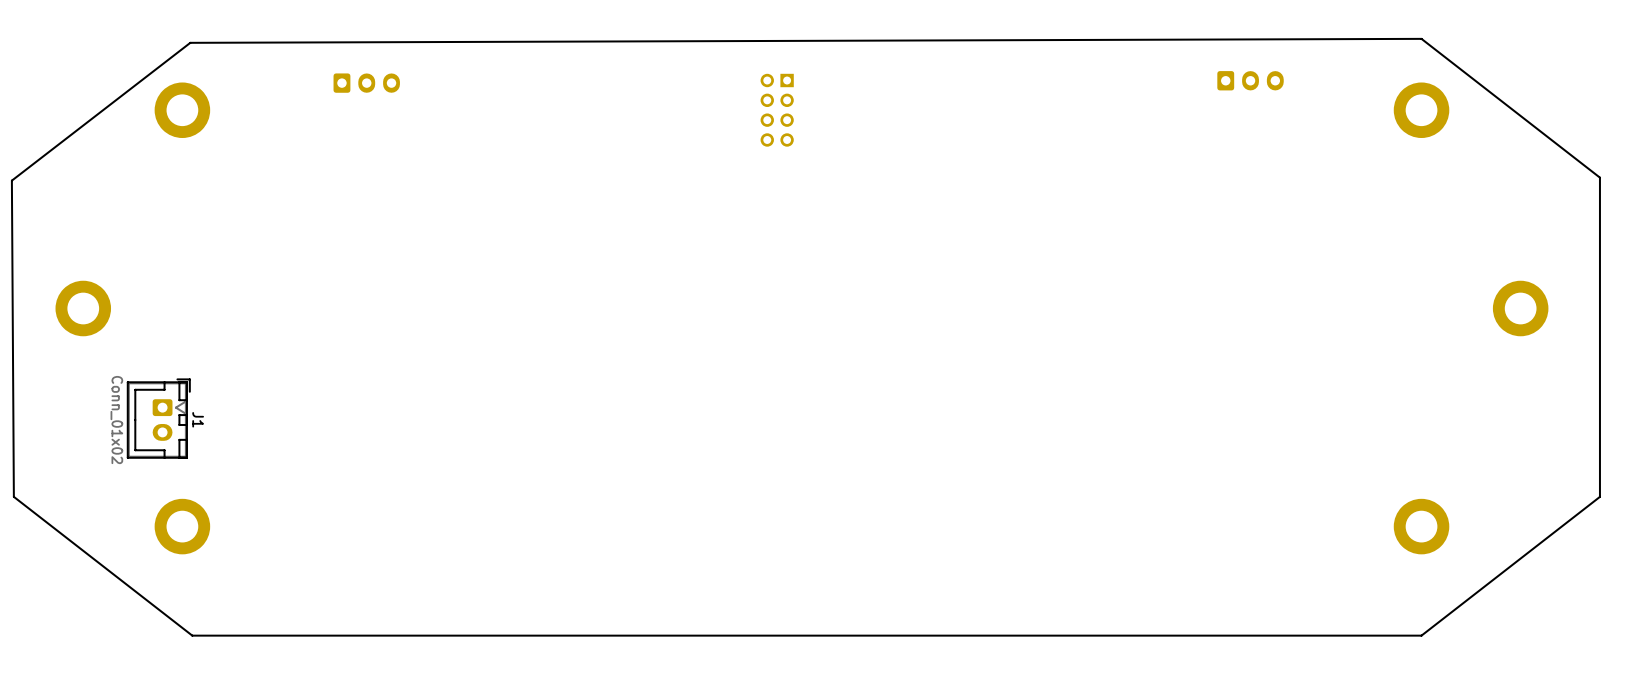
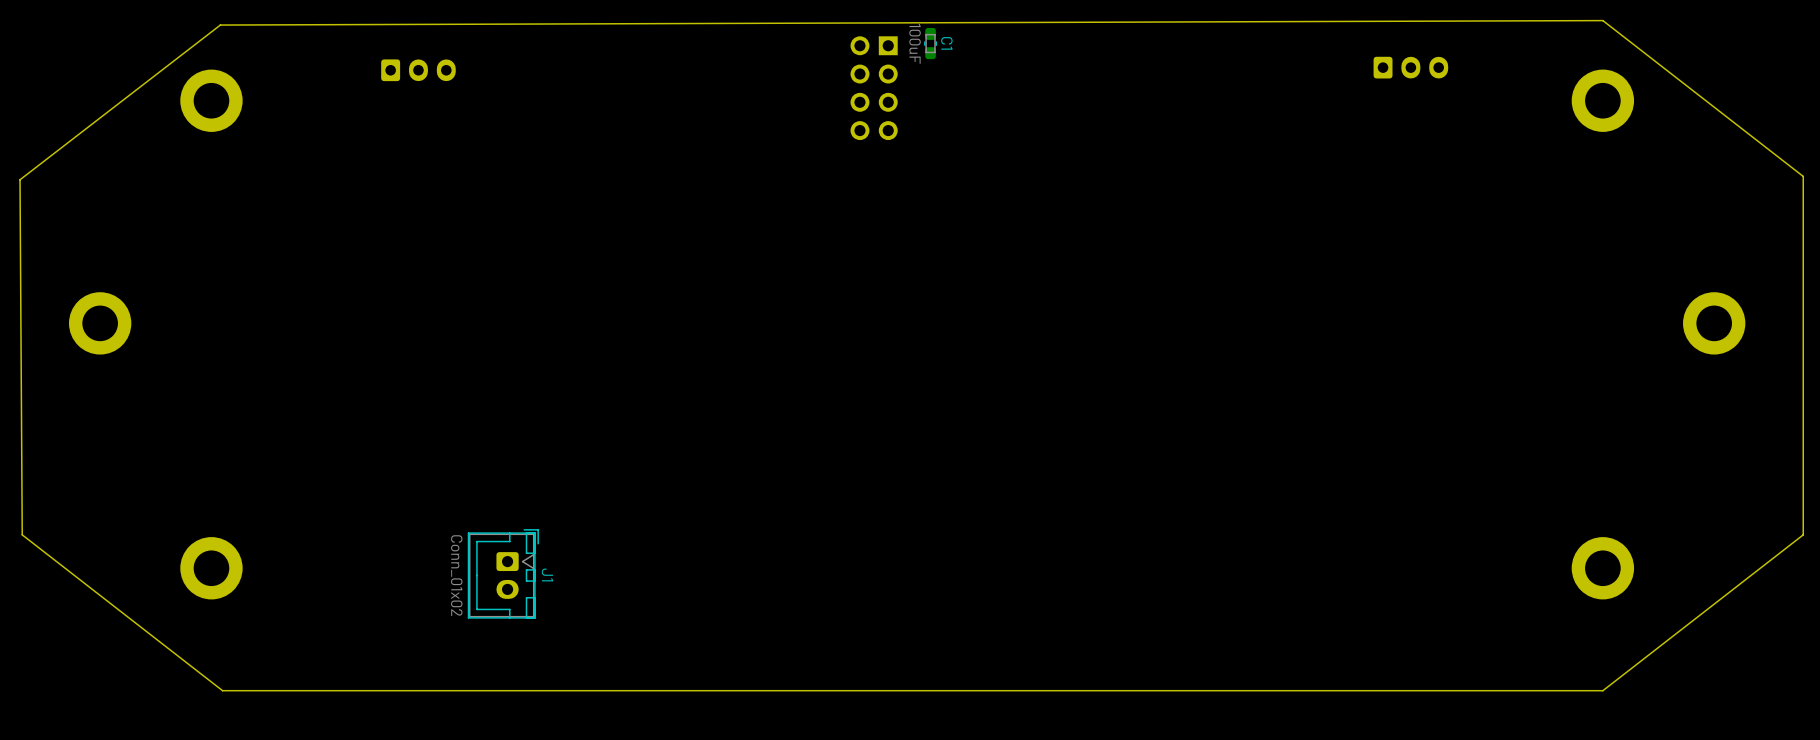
C1: none -> 100uF (930, 43)
part: none -> (874, 88)
part: (777, 110) -> none
J1 position: (158, 418) -> (503, 573)

